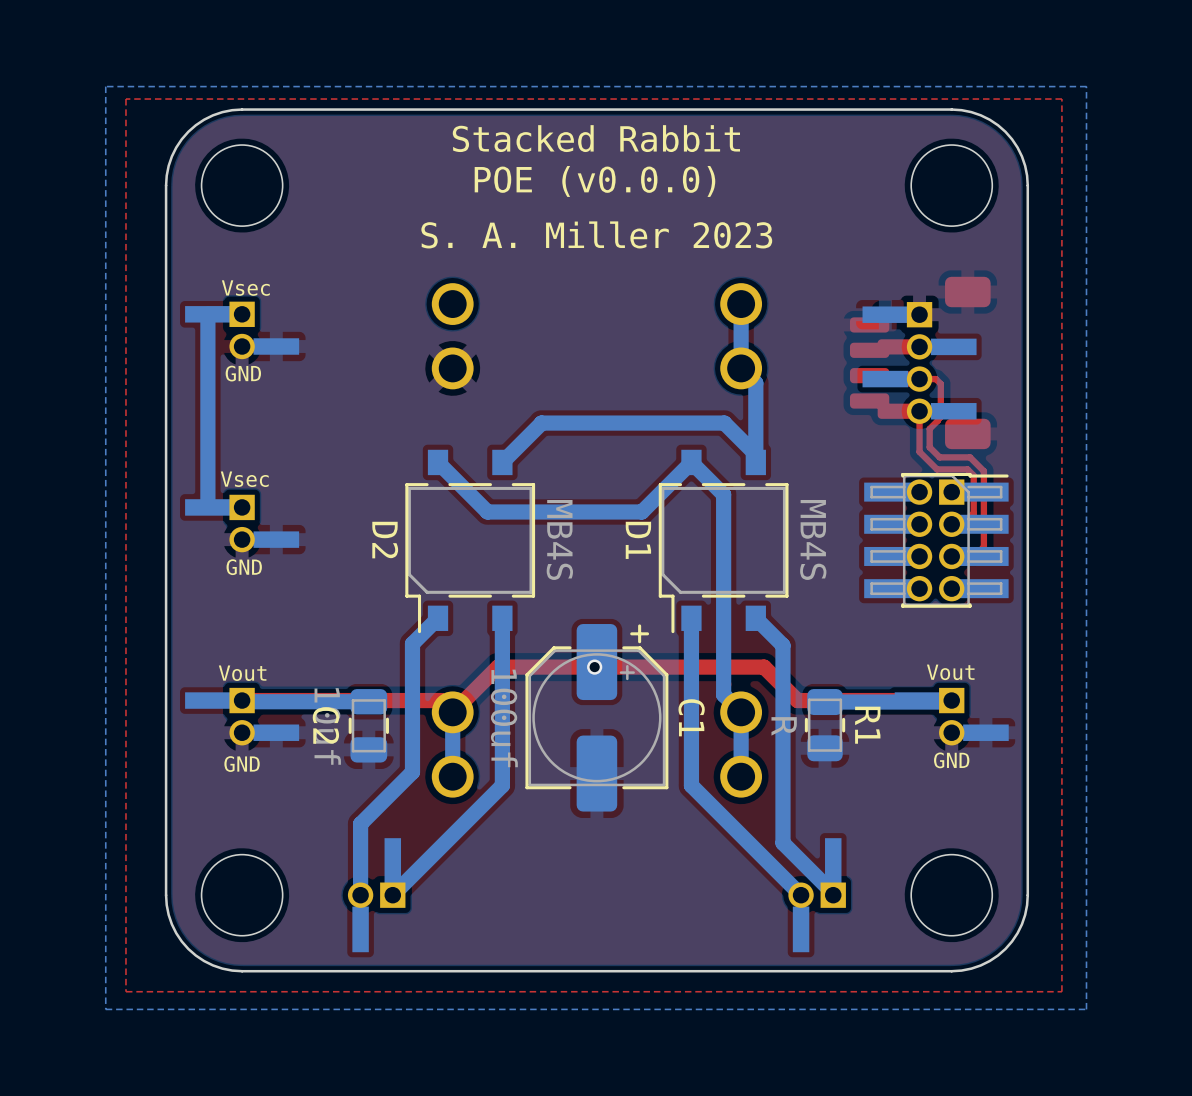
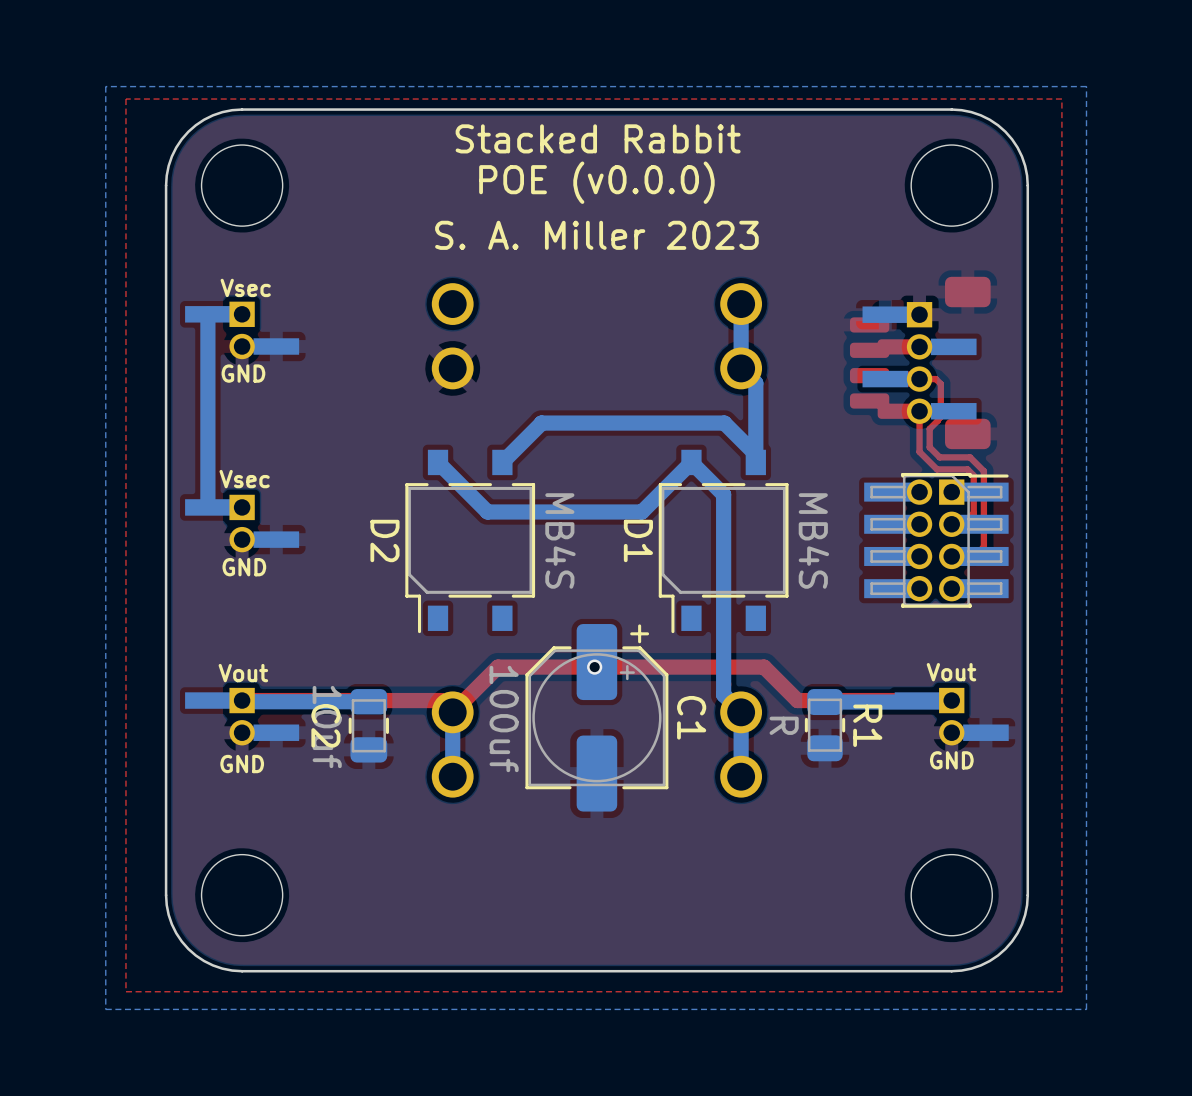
bottom track: (438, 618) (412, 643) (412, 772) (360, 824) (360, 895) -> none
bottom track: (502, 618) (502, 785) (392, 895) -> none
bottom track: (691, 618) (691, 785) (801, 895) -> none
bottom track: (755, 618) (782, 645) (782, 843) (833, 895) -> none
part: (376, 895) -> none
part: (817, 895) -> none

